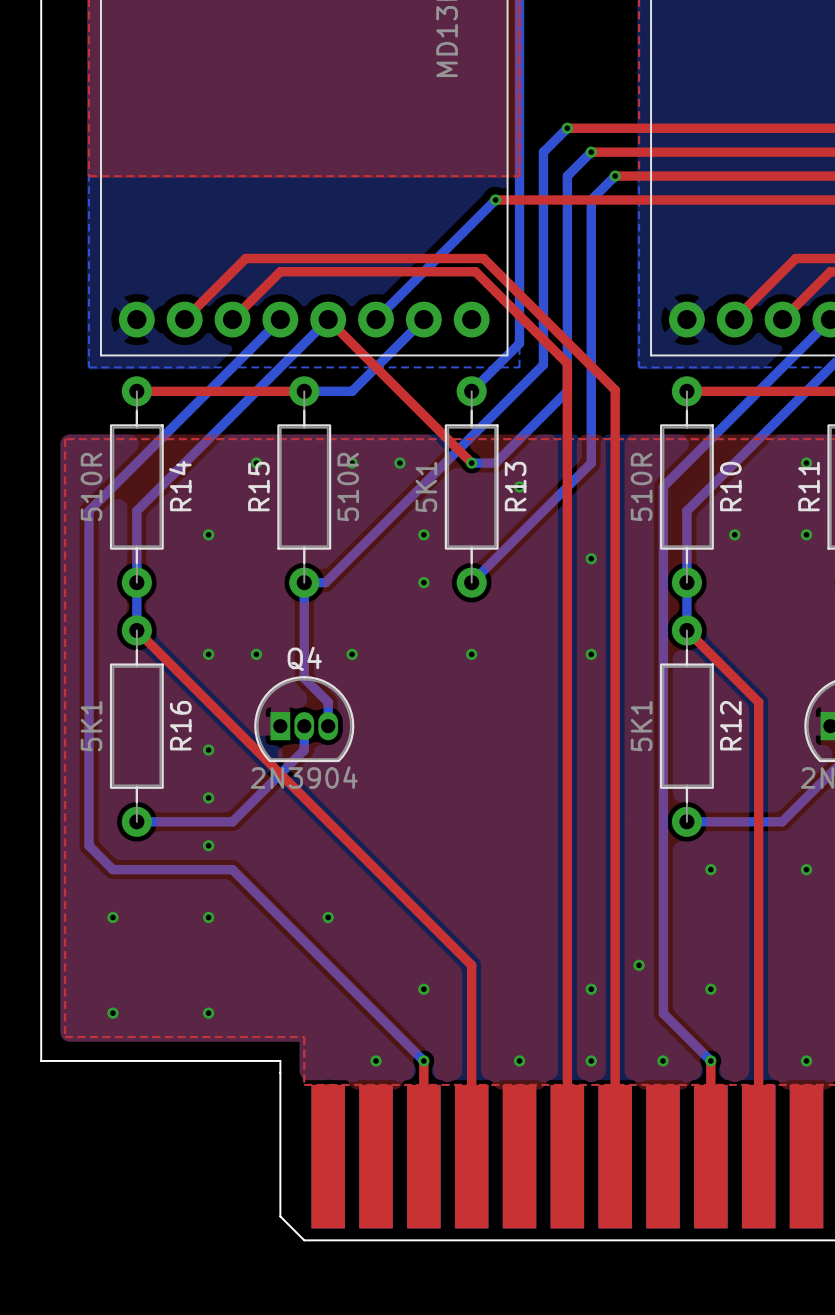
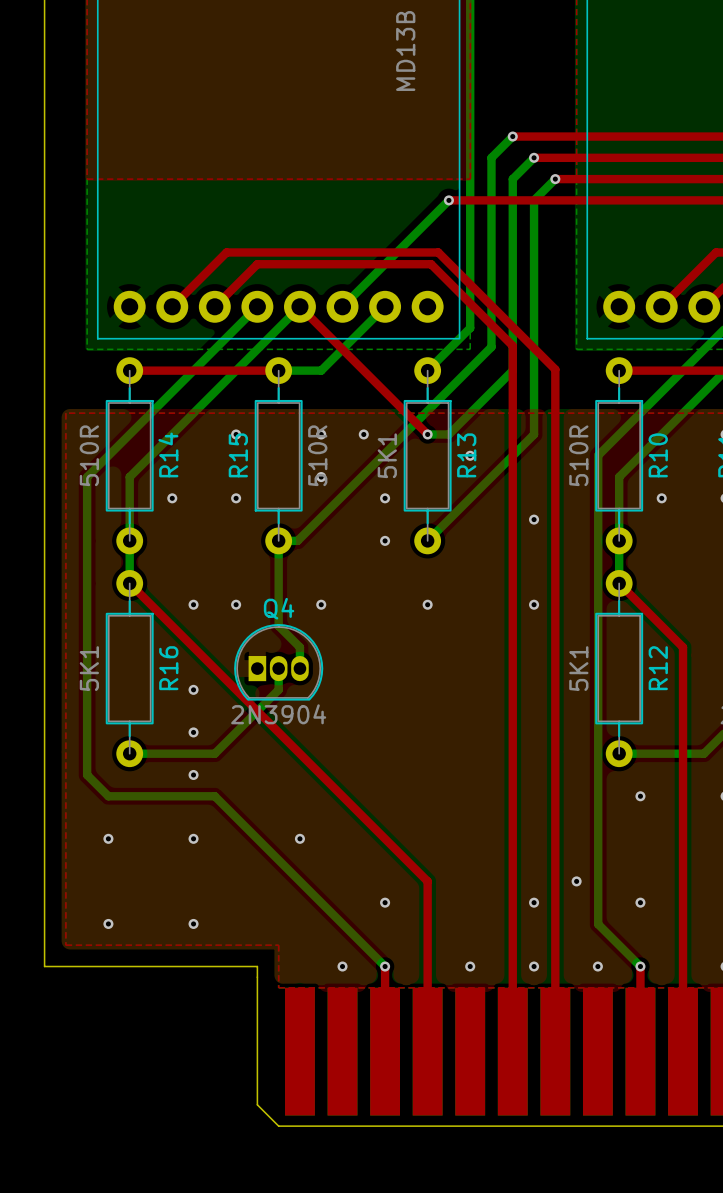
via: none -> (321, 477)
via: none -> (172, 498)
via: (208, 534) -> none
via: none -> (236, 498)

